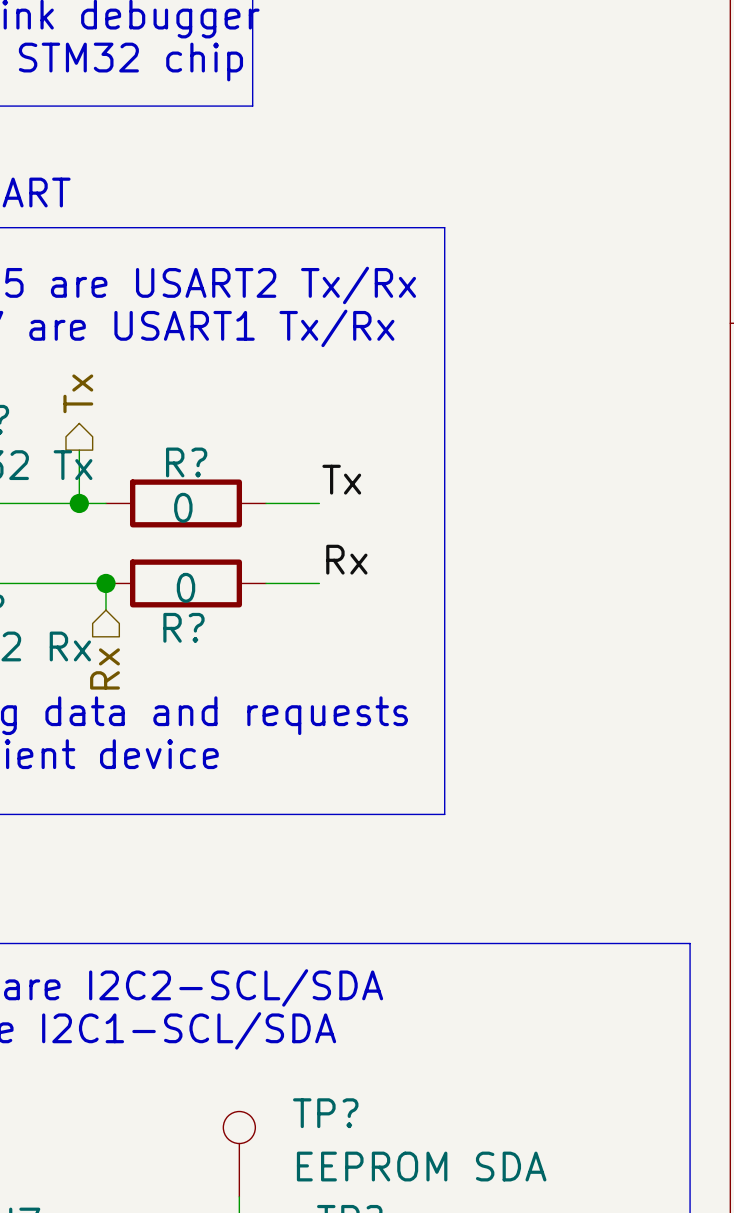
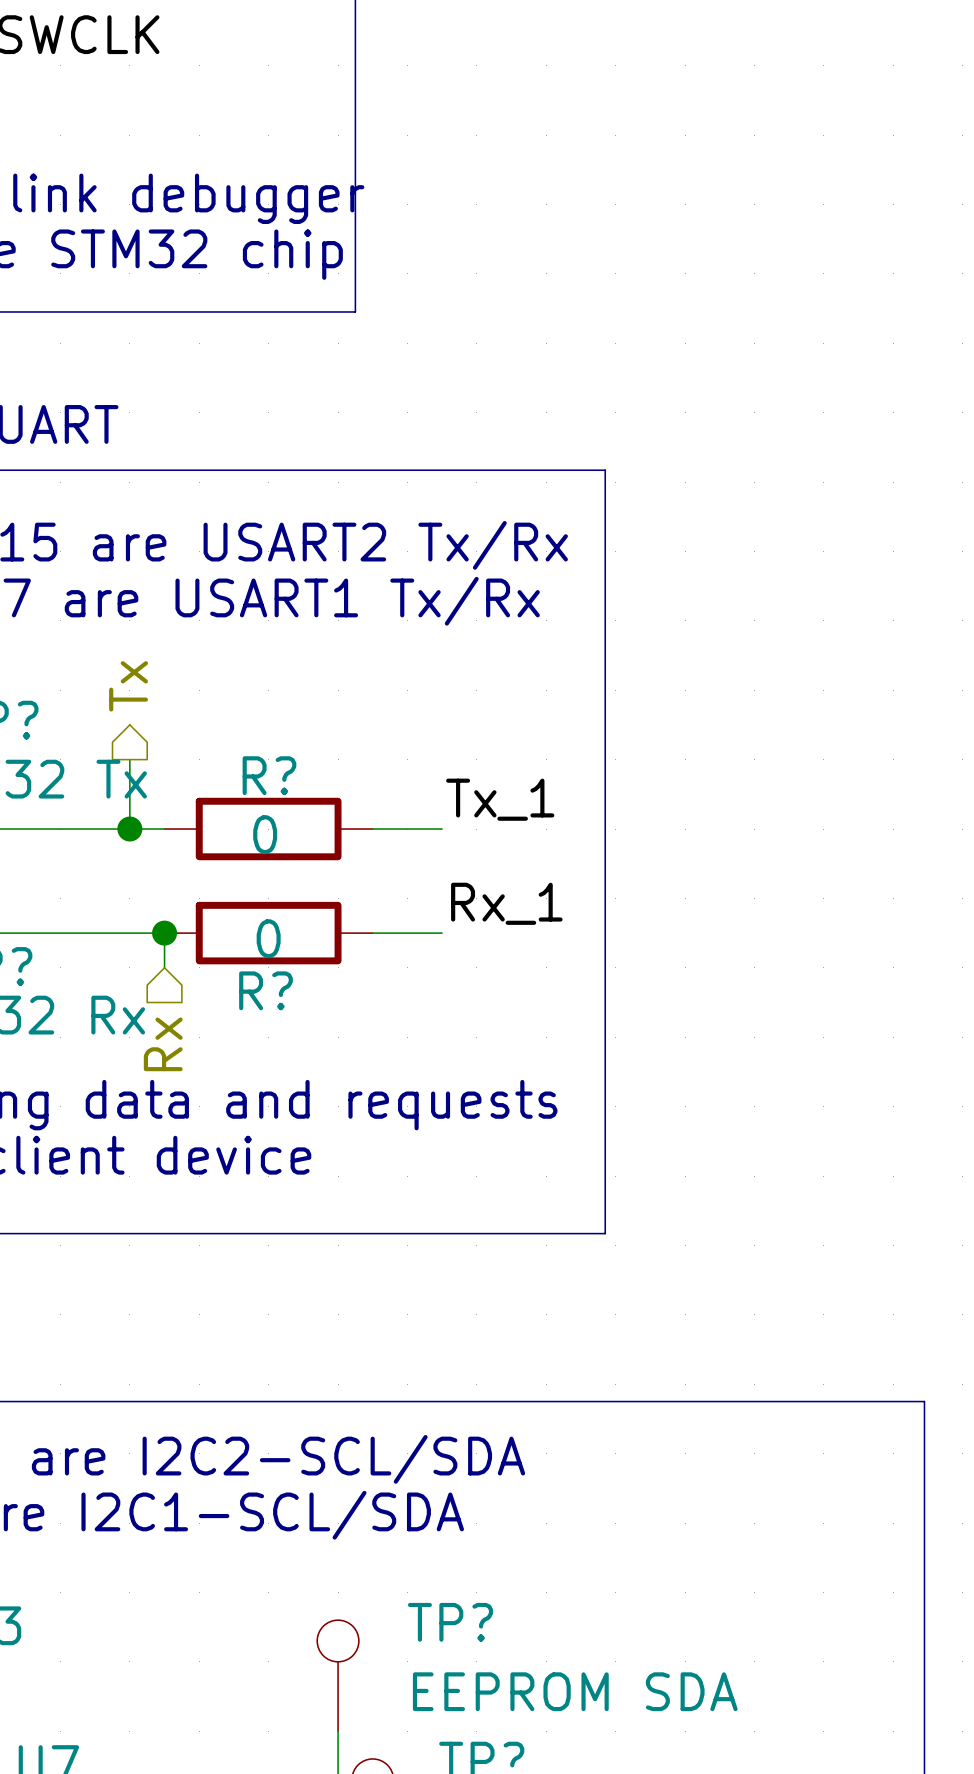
label: Tx (341, 479) -> Tx_1 (500, 799)
label: Rx (346, 559) -> Rx_1 (506, 903)

